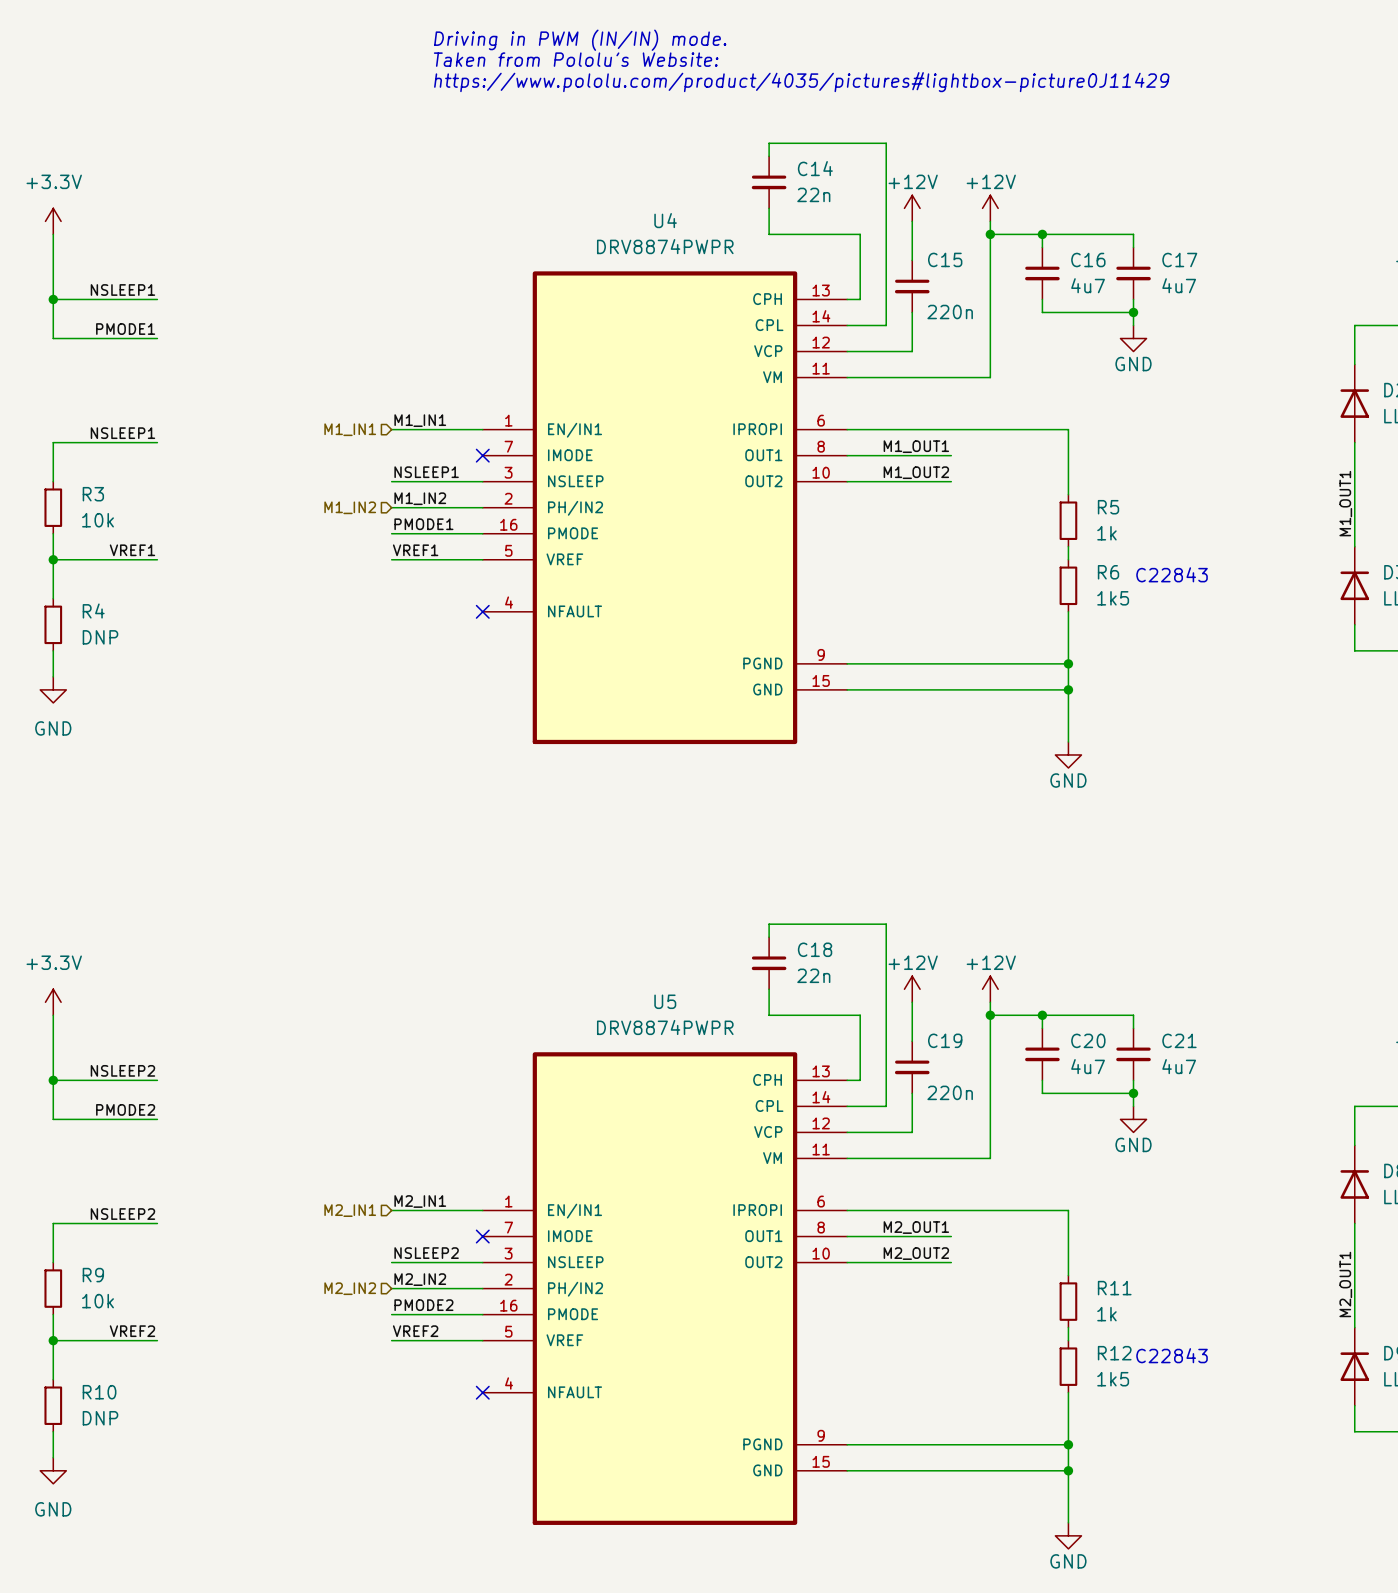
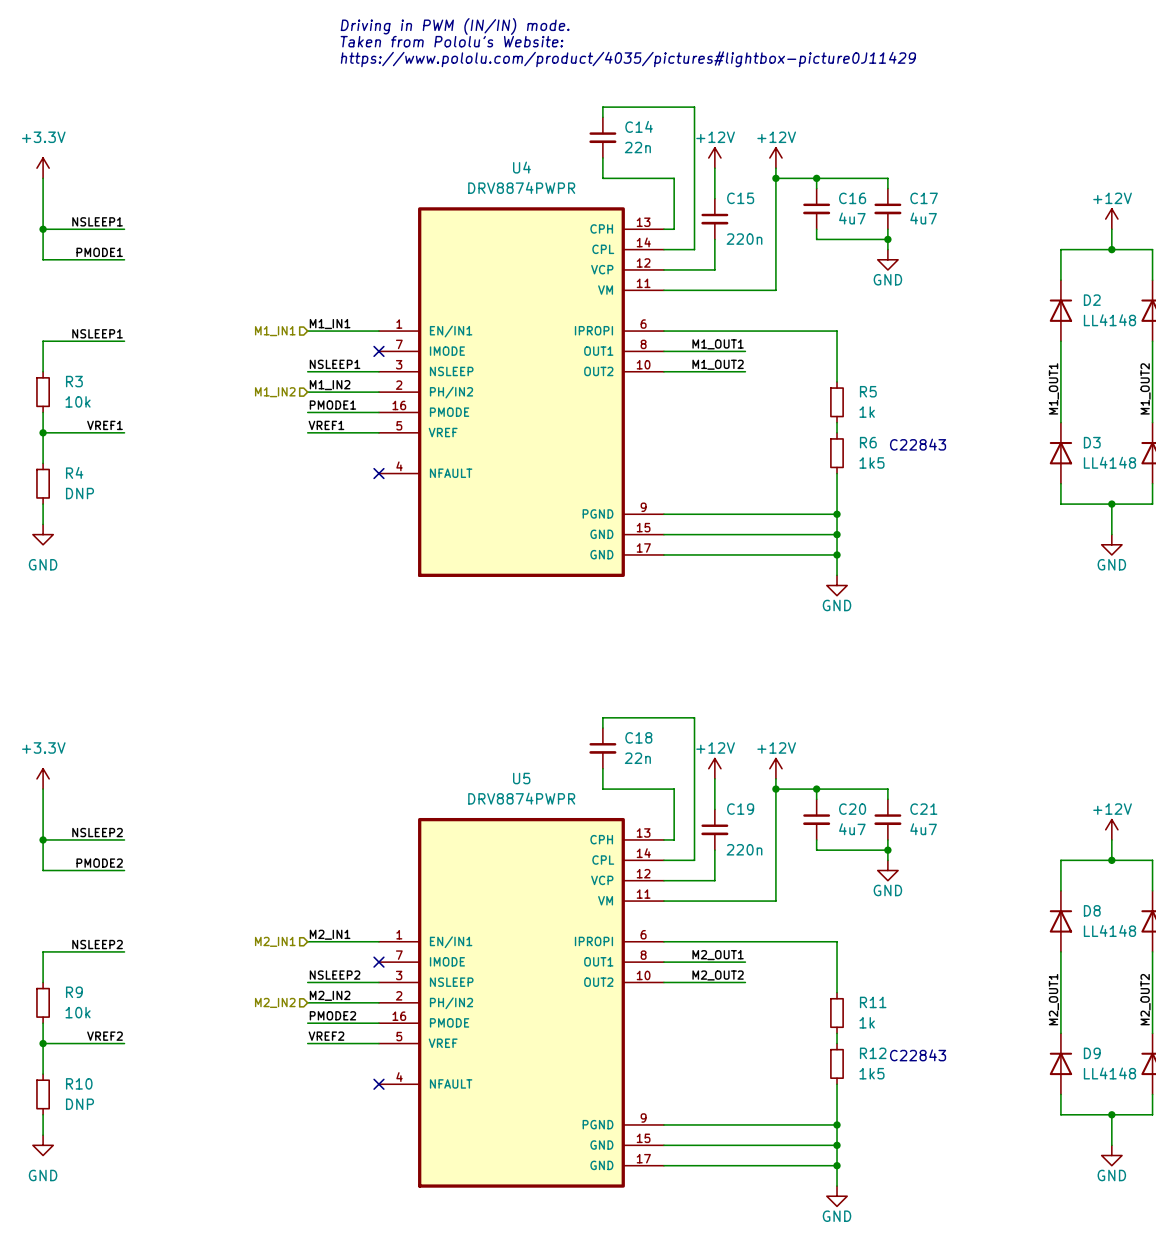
U4 symbol: [482, 271, 848, 745] -> [378, 207, 664, 577]
wire: none -> (663, 554) (837, 554)
junction: none -> (837, 554)
U5 symbol: [482, 1052, 848, 1525] -> [378, 817, 664, 1188]
wire: none -> (663, 1165) (837, 1165)
junction: none -> (837, 1165)

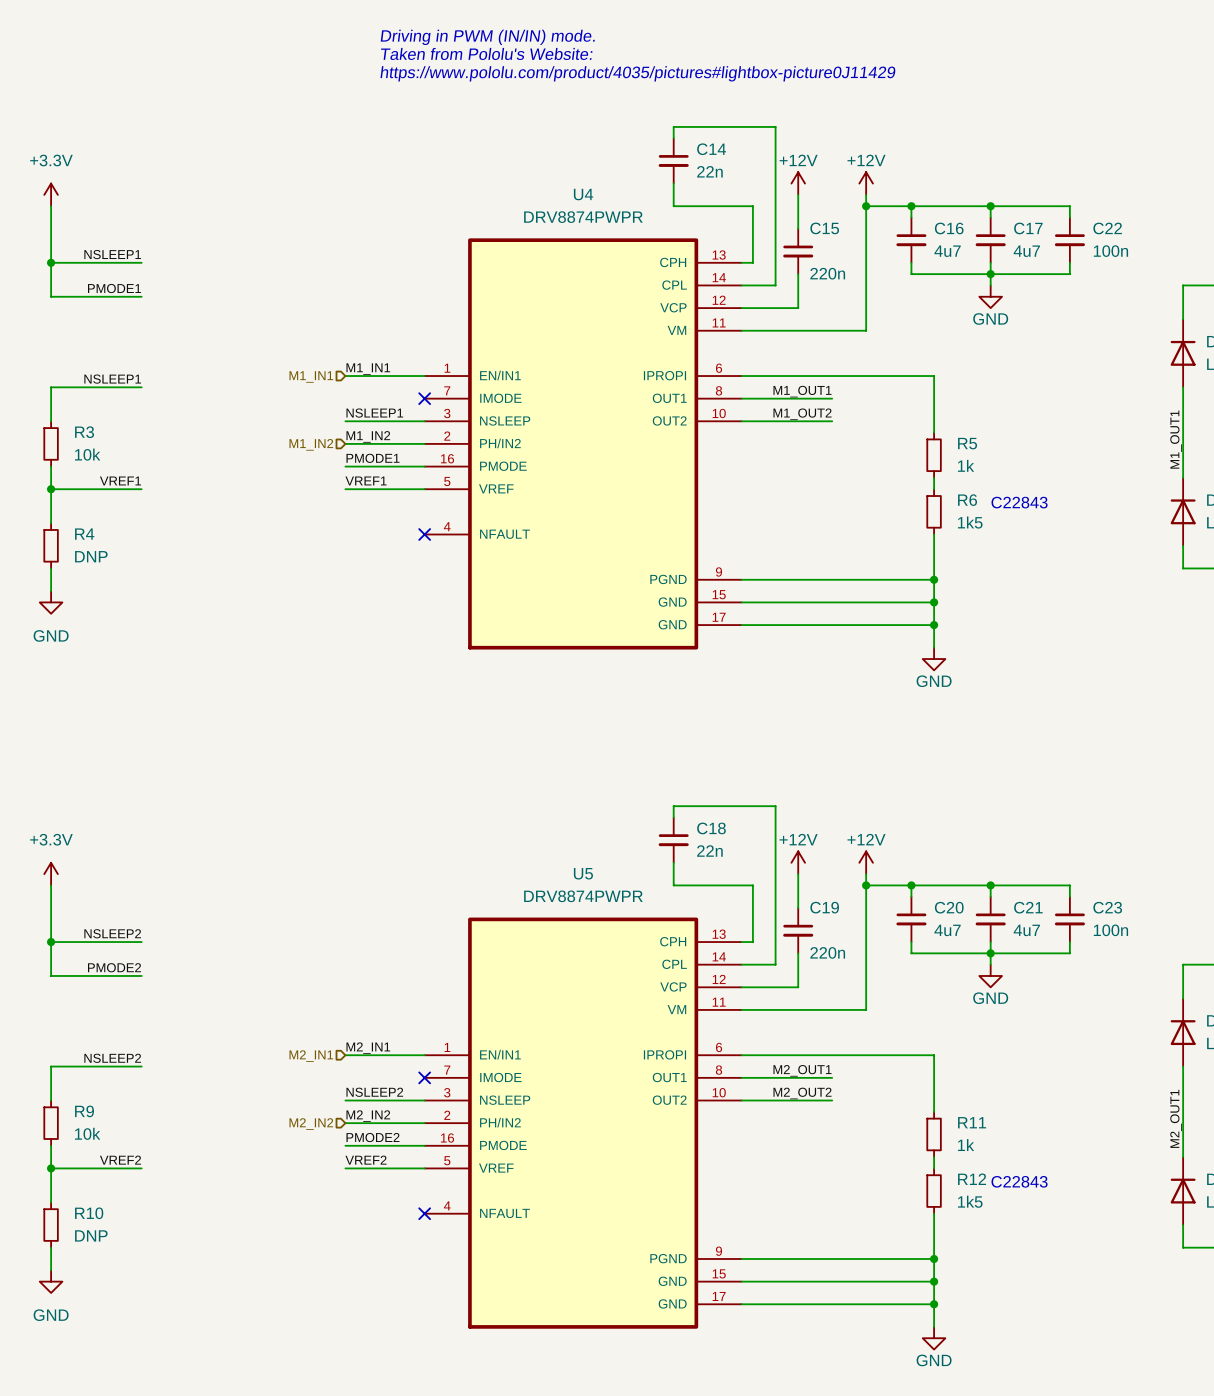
wire: none -> (990, 206) (1069, 206) (1069, 217)
junction: none -> (990, 206)
C22: none -> 100n (1069, 240)
wire: none -> (1069, 262) (1069, 274) (990, 274)
wire: none -> (990, 885) (1069, 885) (1069, 896)
junction: none -> (990, 885)
C23: none -> 100n (1069, 919)
wire: none -> (1069, 942) (1069, 953) (990, 953)

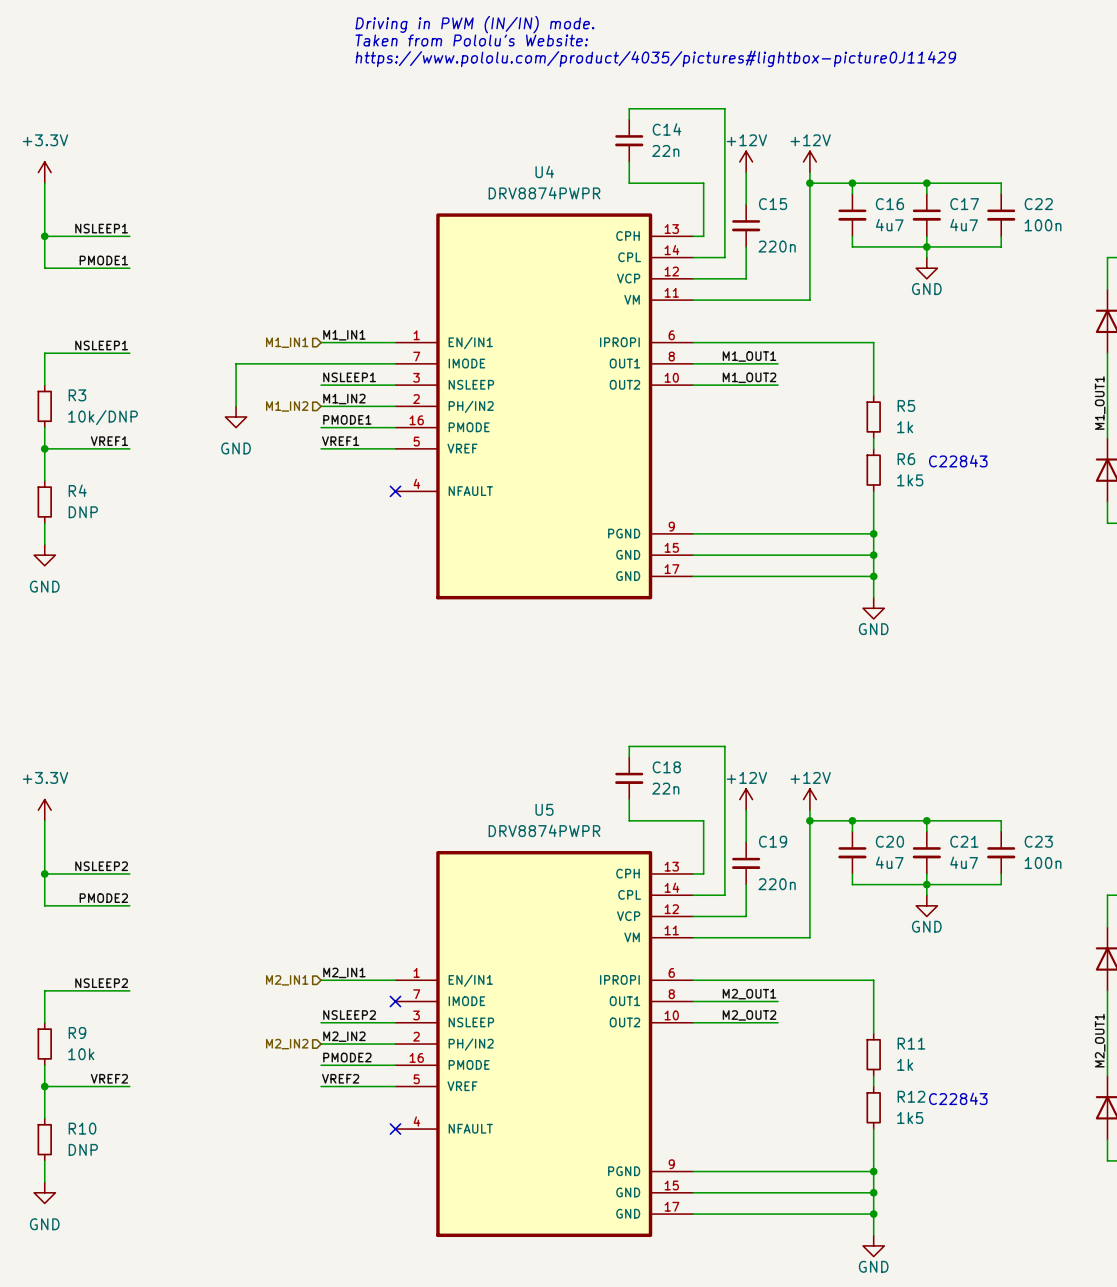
wire: none -> (395, 363) (236, 363) (236, 406)
no-connect mark: (424, 398) -> none
R3 value: 10k (87, 454) -> 10k/DNP (103, 417)
power symbol: none -> GND (236, 416)

